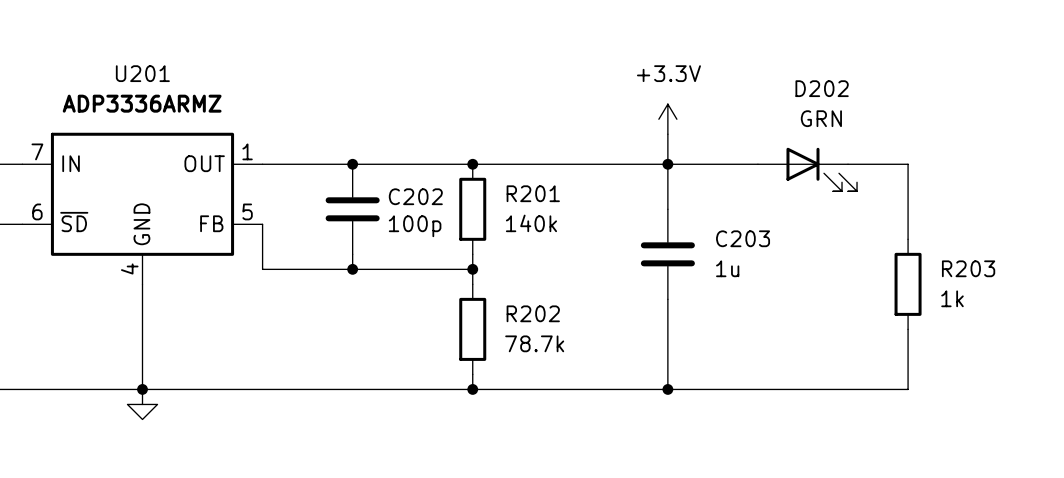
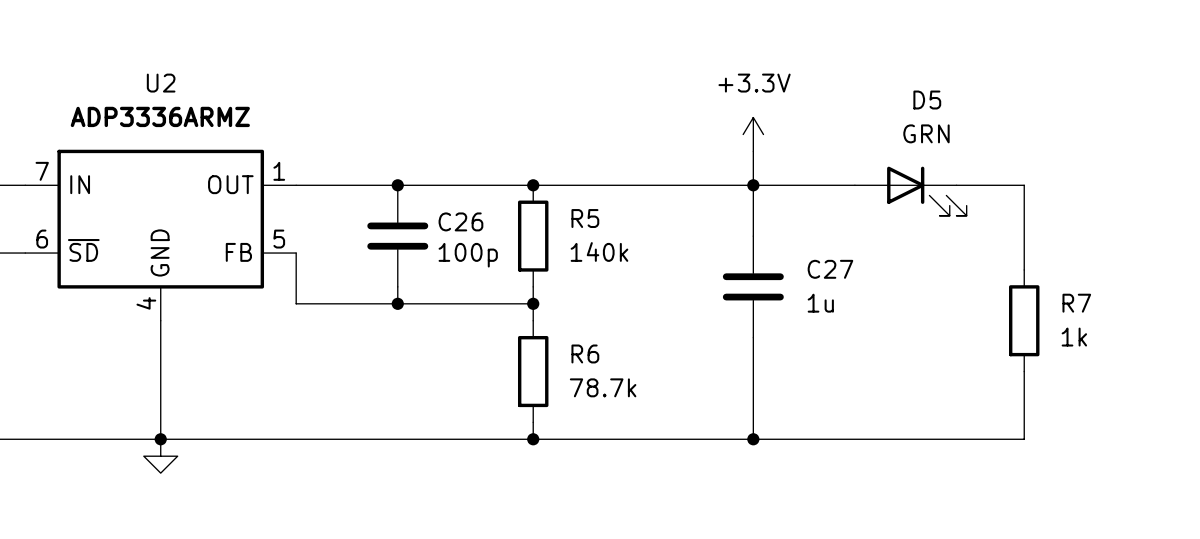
U201 name: U201 (142, 73) -> U2 (161, 83)
D202 name: D202 (822, 88) -> D5 (927, 100)
R201 name: R201 (533, 193) -> R5 (585, 218)
C202 name: C202 (415, 196) -> C26 (460, 221)
C203 name: C203 (743, 238) -> C27 (830, 269)
R203 name: R203 (968, 268) -> R7 (1076, 303)
R202 name: R202 (533, 313) -> R6 (585, 353)

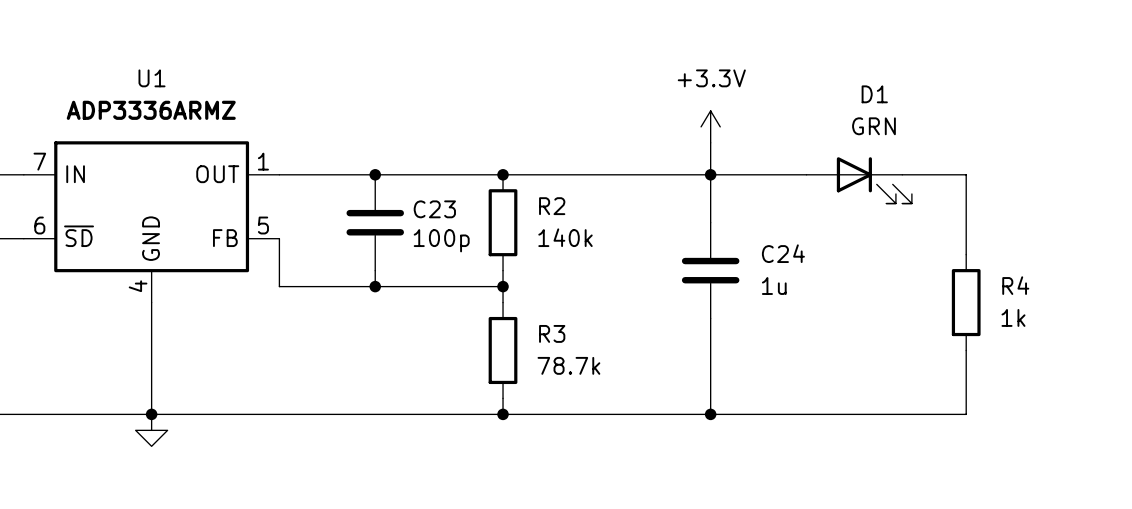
U2 name: U2 (161, 83) -> U1 (152, 78)
D5 name: D5 (927, 100) -> D1 (874, 94)
R5 name: R5 (585, 218) -> R2 (552, 206)
C26 name: C26 (460, 221) -> C23 (434, 209)
C27 name: C27 (830, 269) -> C24 (783, 253)
R7 name: R7 (1076, 303) -> R4 (1015, 285)
R6 name: R6 (585, 353) -> R3 (552, 333)

